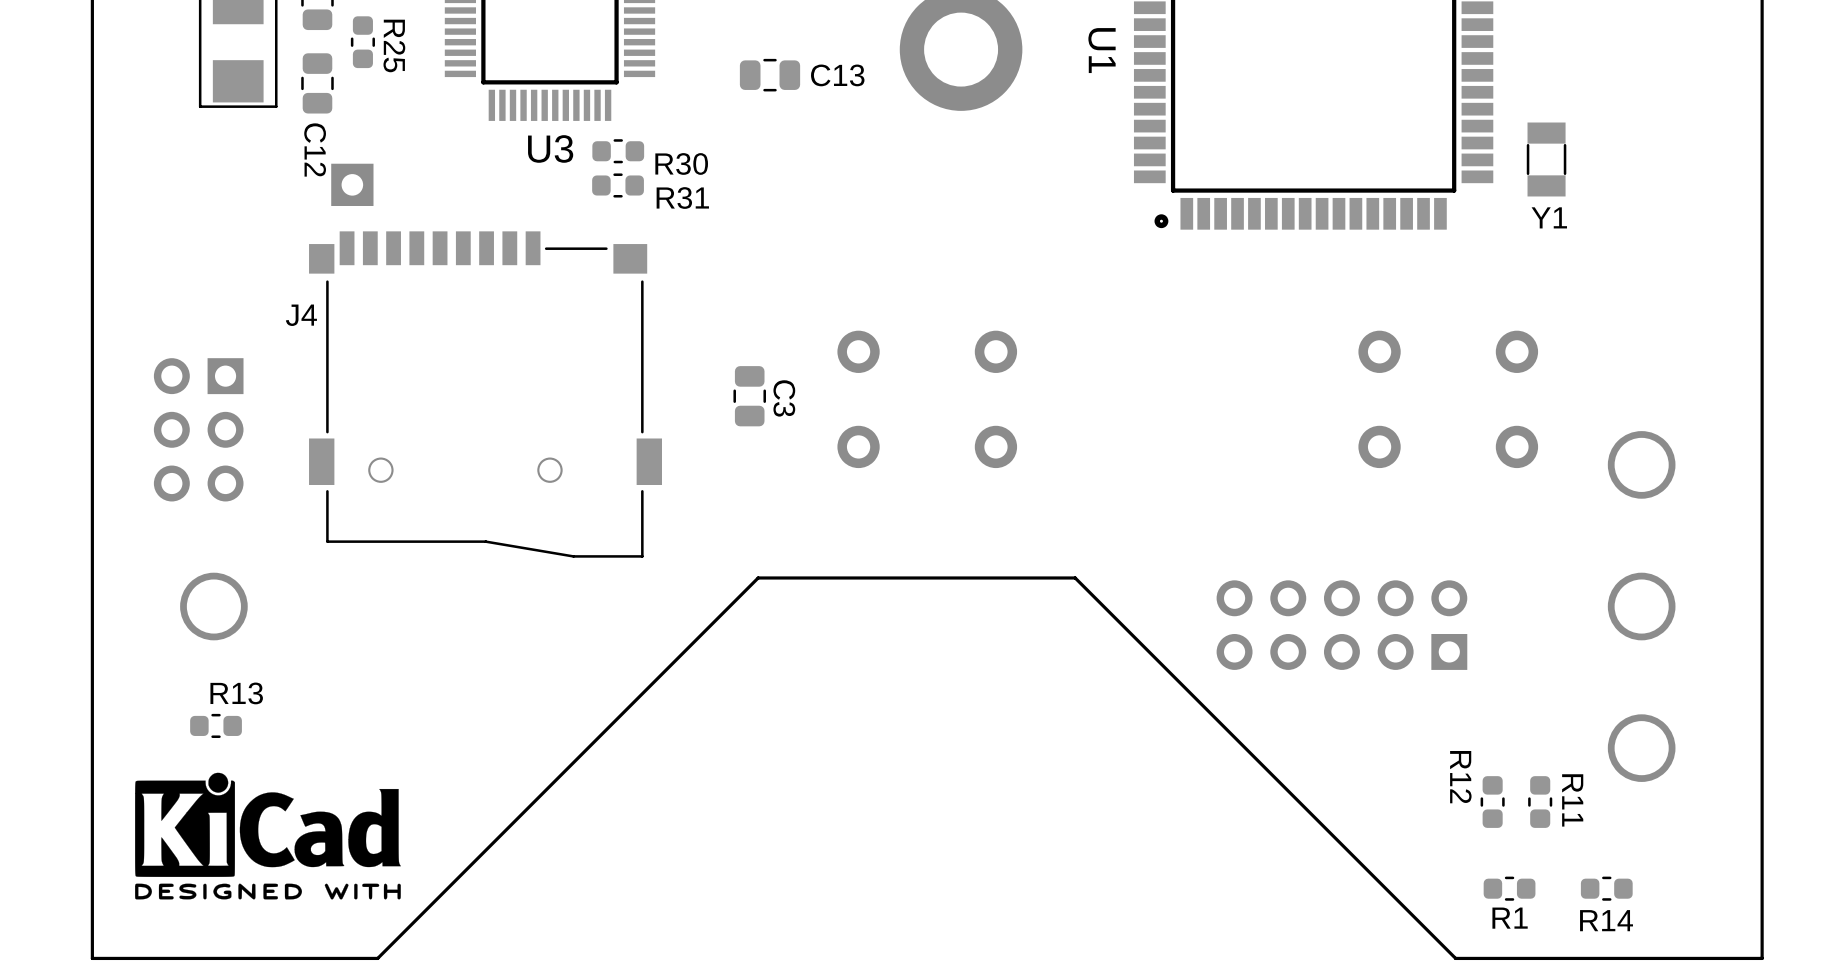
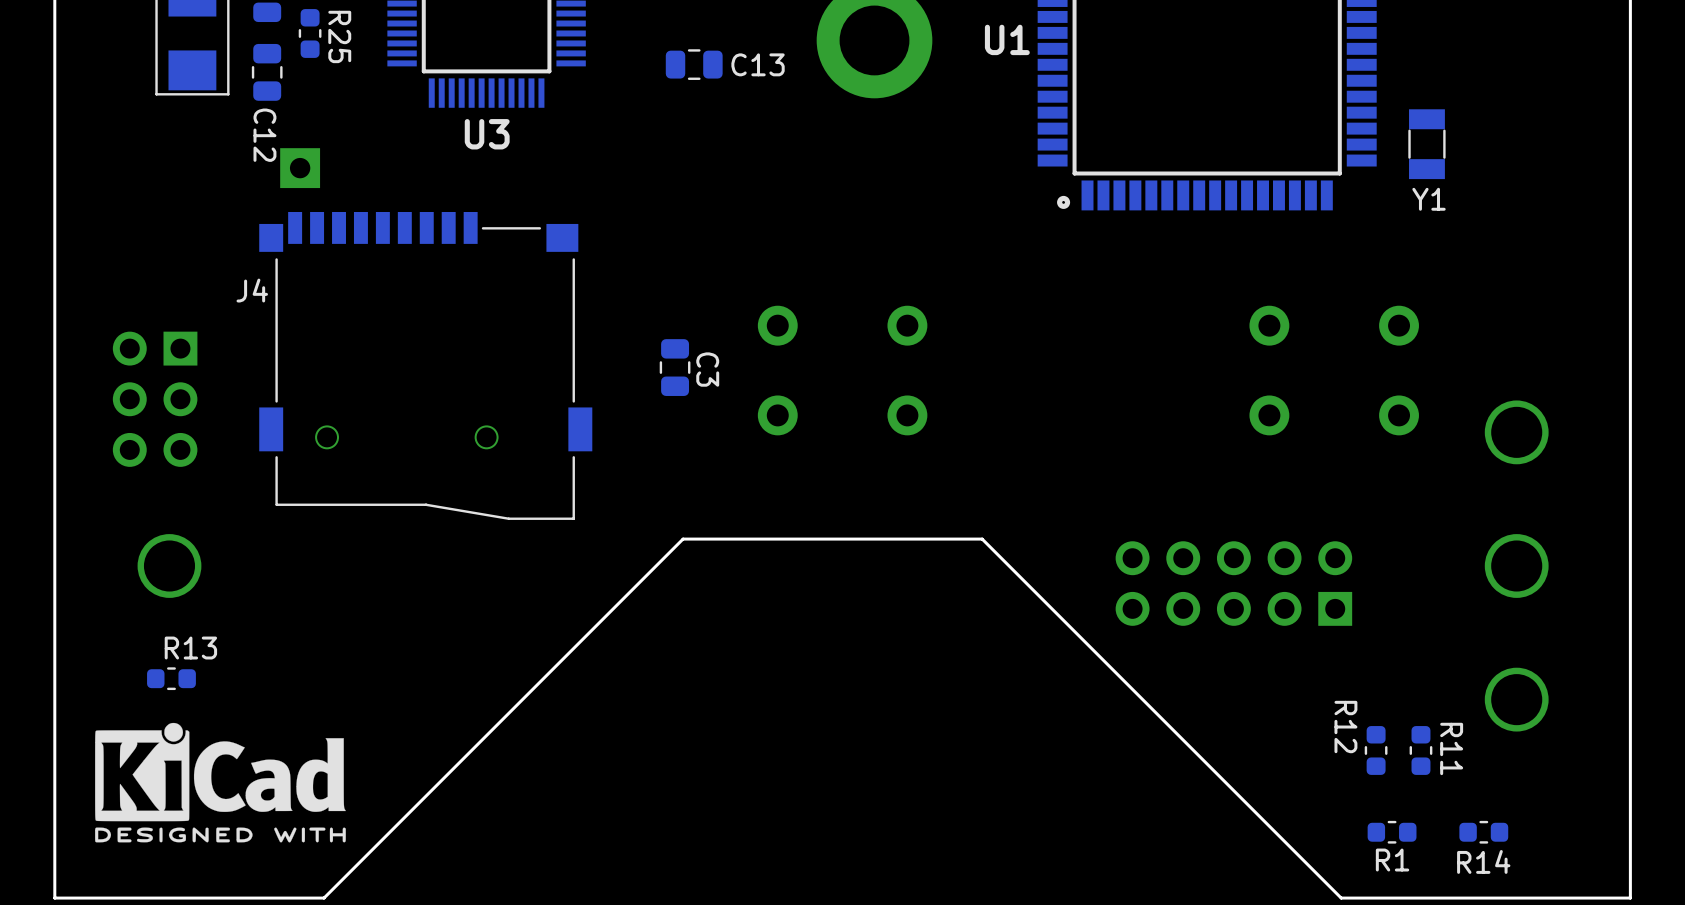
U1 name rotation: 0° (1102, 50) -> 90° counterclockwise (1007, 39)
R30: (618, 151) -> none
R31: (618, 185) -> none

